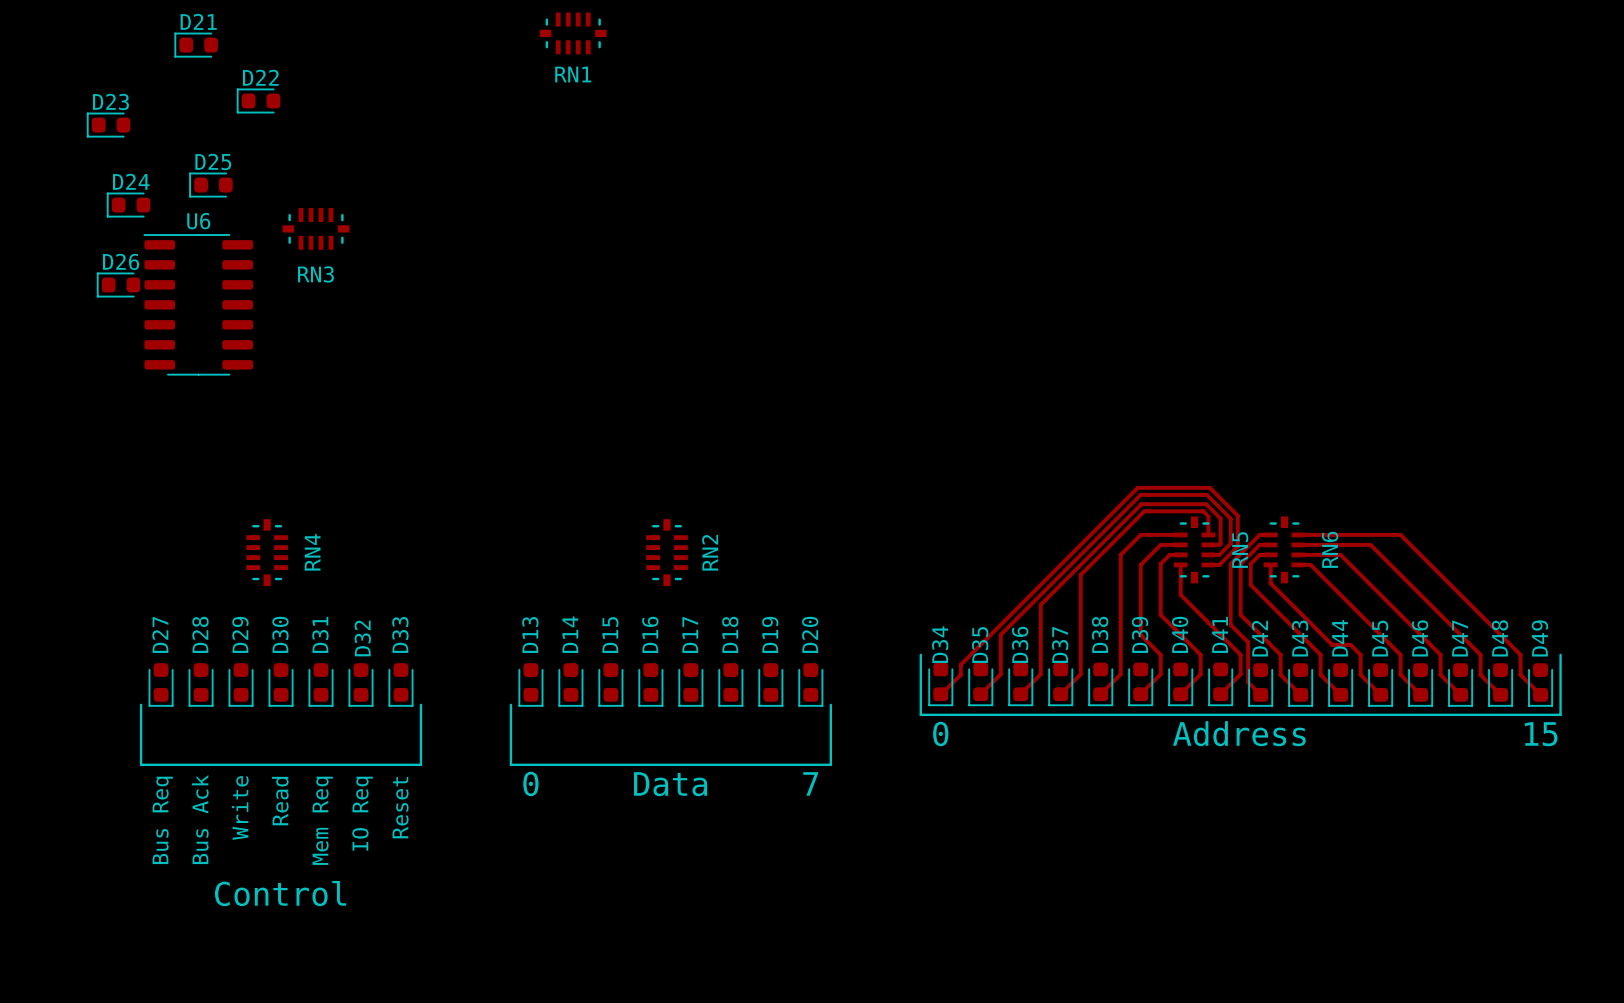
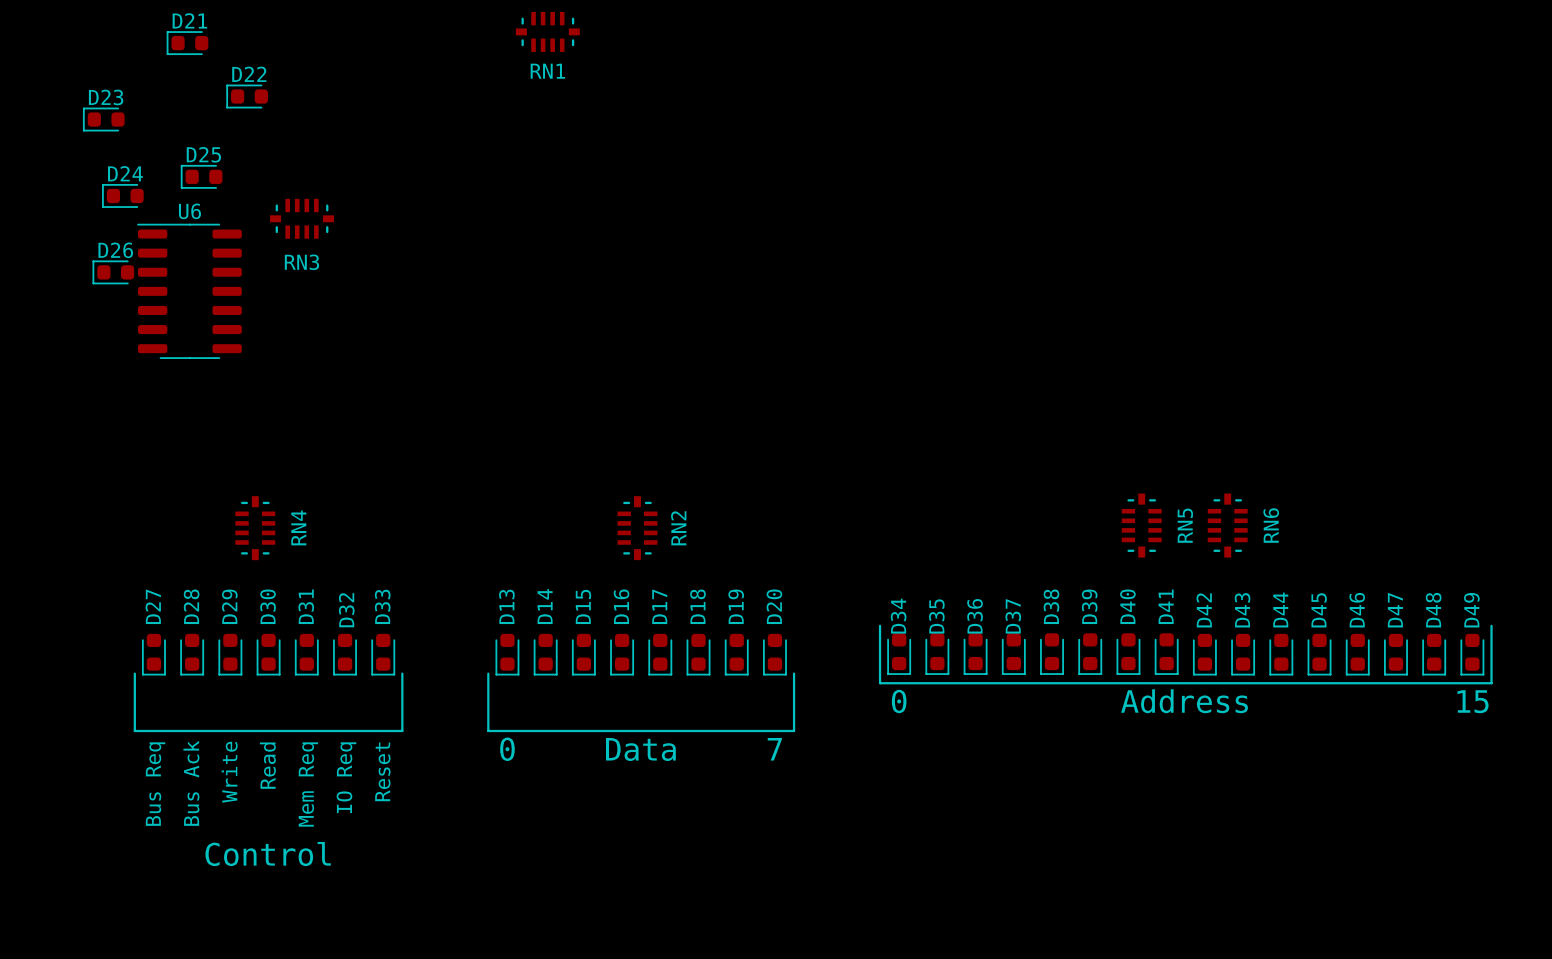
track: (1180, 534) (1140, 534) (1120, 554) (1120, 674) (1100, 694) -> none
track: (1208, 534) (1208, 516) (1203, 511) (1144, 511) (1080, 574) (1080, 674) (1060, 694) -> none
track: (1270, 534) (1259, 534) (1230, 563) (1230, 624) (1248, 642) (1248, 682) (1260, 694) -> none
track: (1298, 534) (1400, 534) (1520, 654) (1520, 674) (1540, 694) -> none
track: (1180, 544) (1160, 544) (1140, 564) (1140, 634) (1160, 654) (1160, 674) (1140, 694) -> none
track: (1208, 544) (1220, 543) (1220, 518) (1206, 504) (1141, 504) (1040, 604) (1040, 674) (1020, 694) -> none
track: (1270, 544) (1259, 544) (1240, 563) (1240, 614) (1280, 654) (1280, 674) (1300, 694) -> none
track: (1298, 544) (1370, 544) (1480, 654) (1480, 674) (1500, 694) -> none
track: (1180, 554) (1169, 554) (1160, 563) (1160, 614) (1200, 654) (1200, 674) (1180, 694) -> none
track: (1208, 554) (1219, 554) (1230, 543) (1230, 518) (1206, 494) (1140, 494) (1000, 634) (1000, 674) (980, 694) -> none
track: (1270, 554) (1259, 554) (1250, 563) (1250, 584) (1320, 654) (1320, 674) (1340, 694) -> none
track: (1298, 554) (1340, 554) (1440, 654) (1440, 674) (1460, 694) -> none
track: (1180, 564) (1180, 594) (1240, 654) (1240, 674) (1220, 694) -> none
track: (1208, 564) (1219, 564) (1237, 546) (1237, 515) (1209, 487) (1137, 487) (960, 664) (960, 674) (940, 694) -> none
track: (1270, 564) (1270, 583) (1332, 644) (1350, 644) (1360, 654) (1360, 674) (1380, 694) -> none
track: (1298, 564) (1310, 564) (1400, 654) (1400, 674) (1420, 694) -> none

